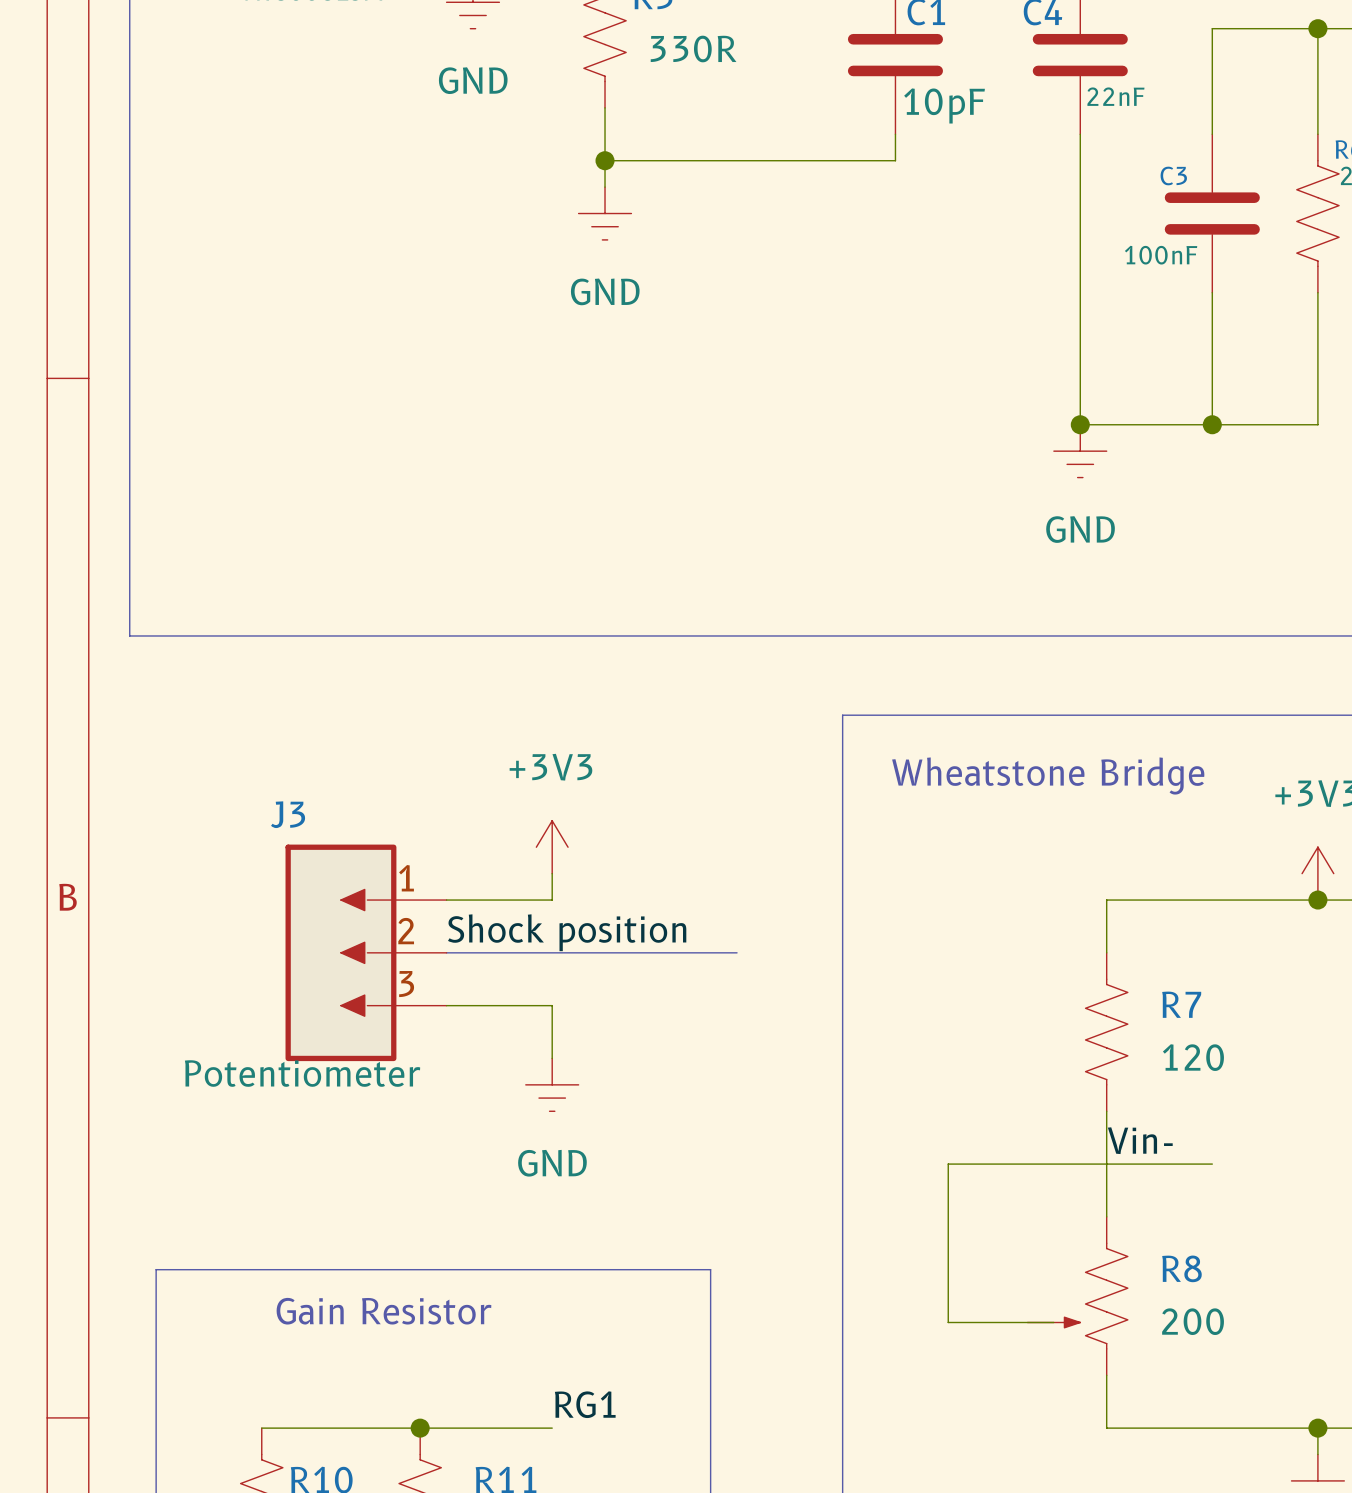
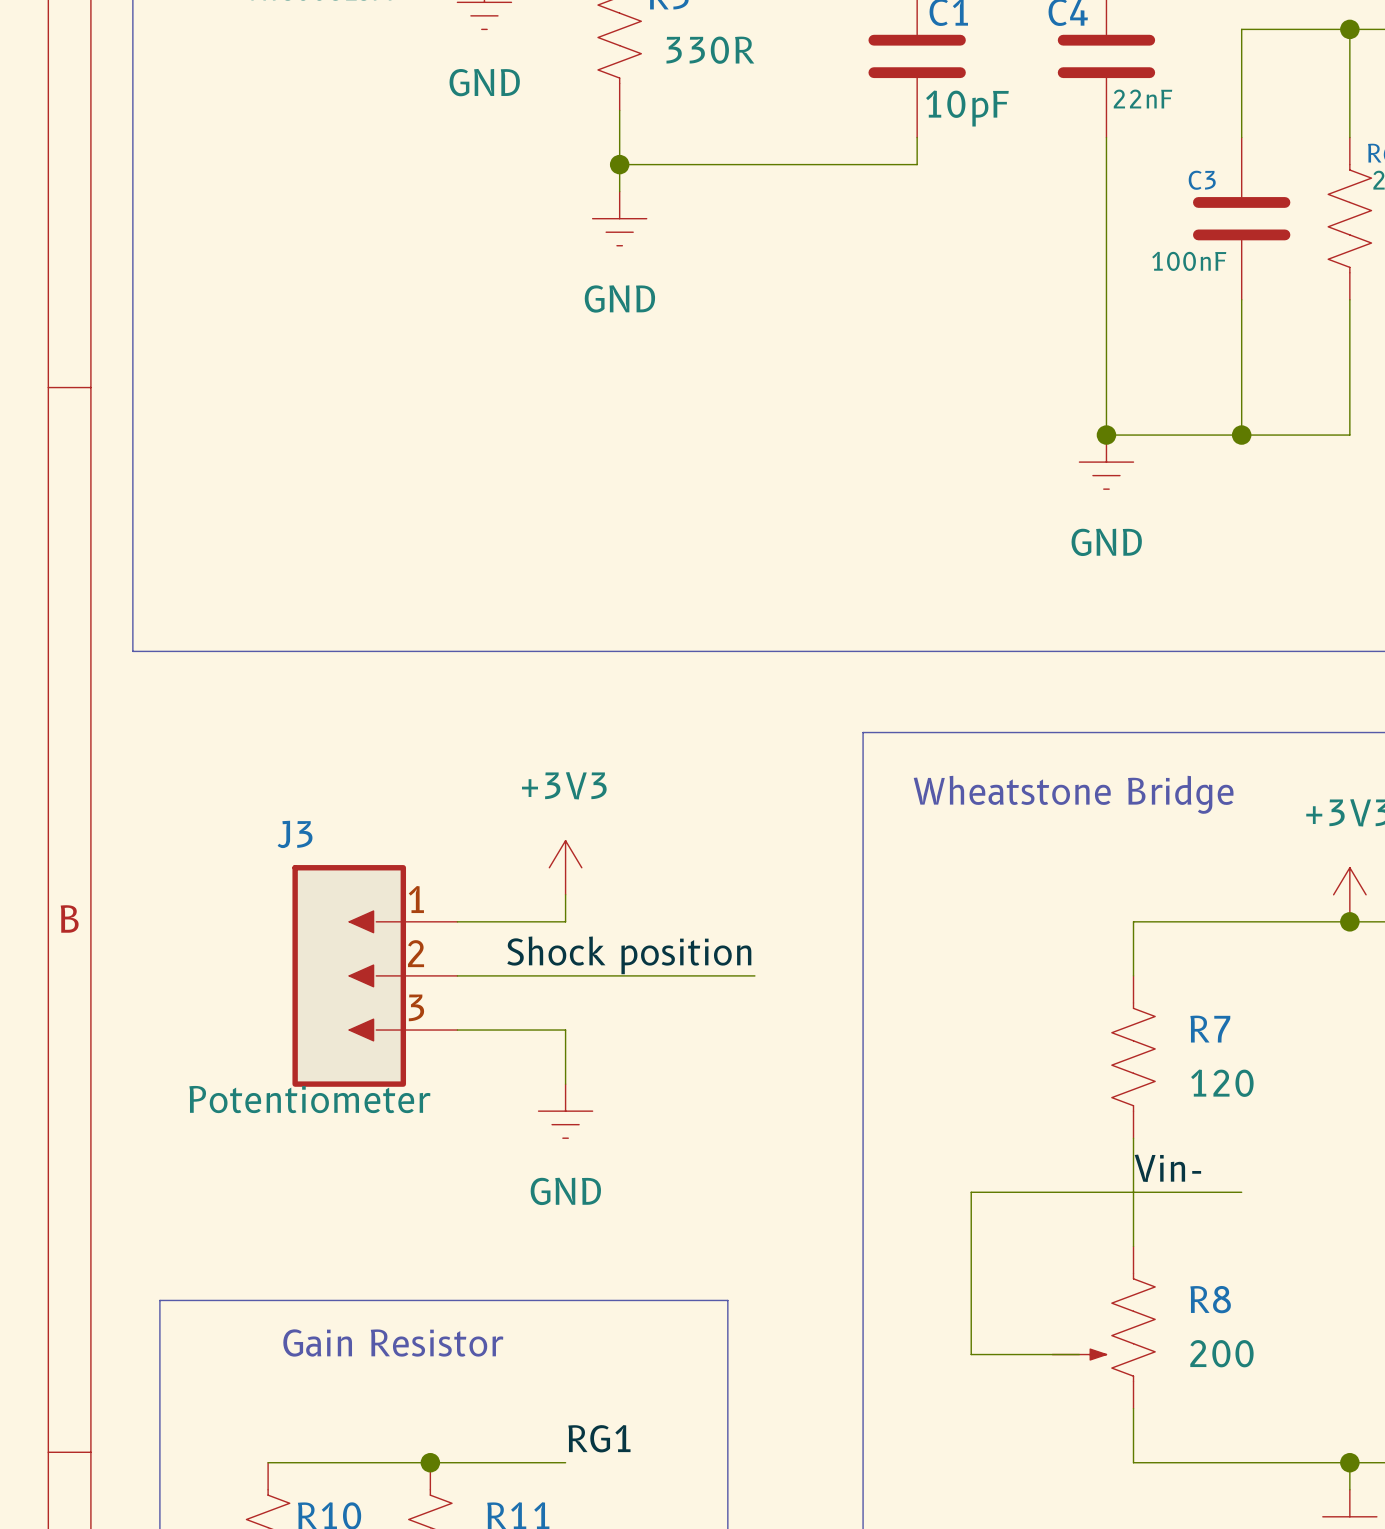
label position: Shock position (567, 932) -> Shock position (629, 955)
line: (446, 952) (737, 952) -> none

